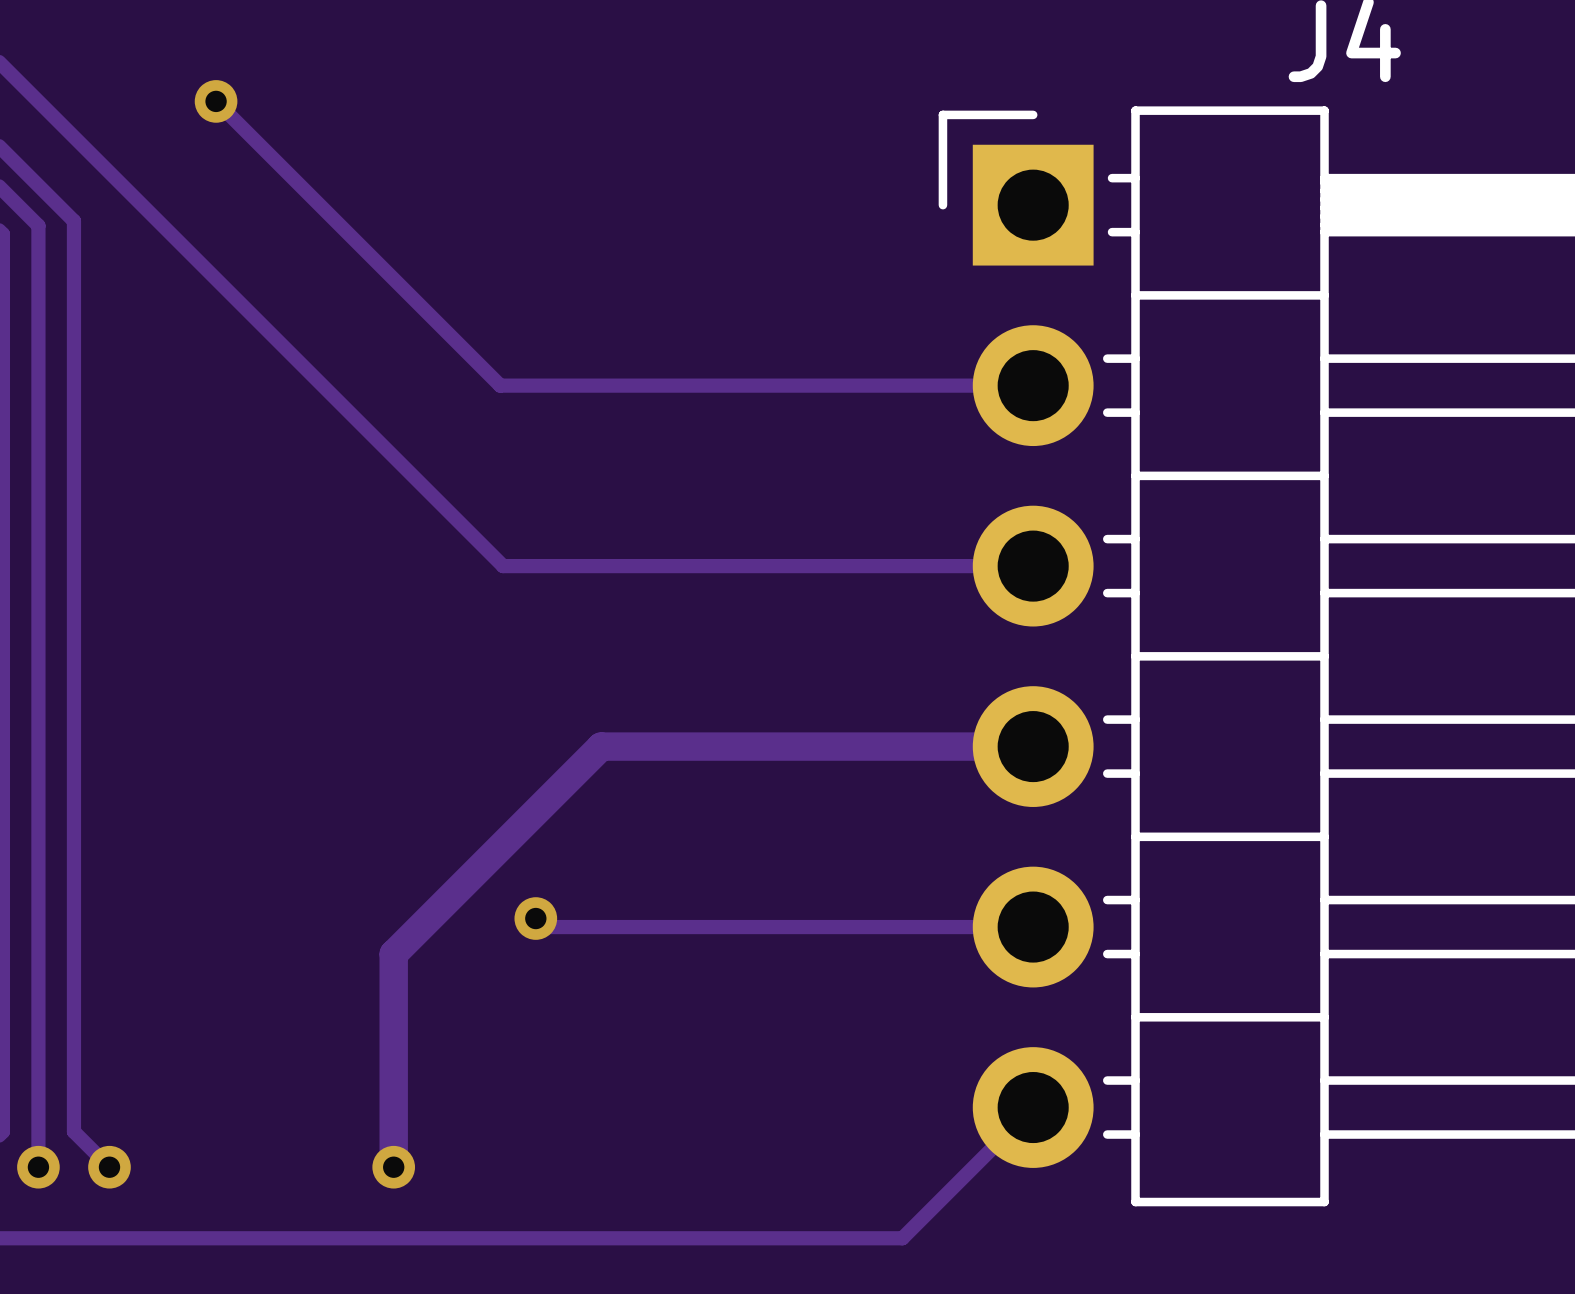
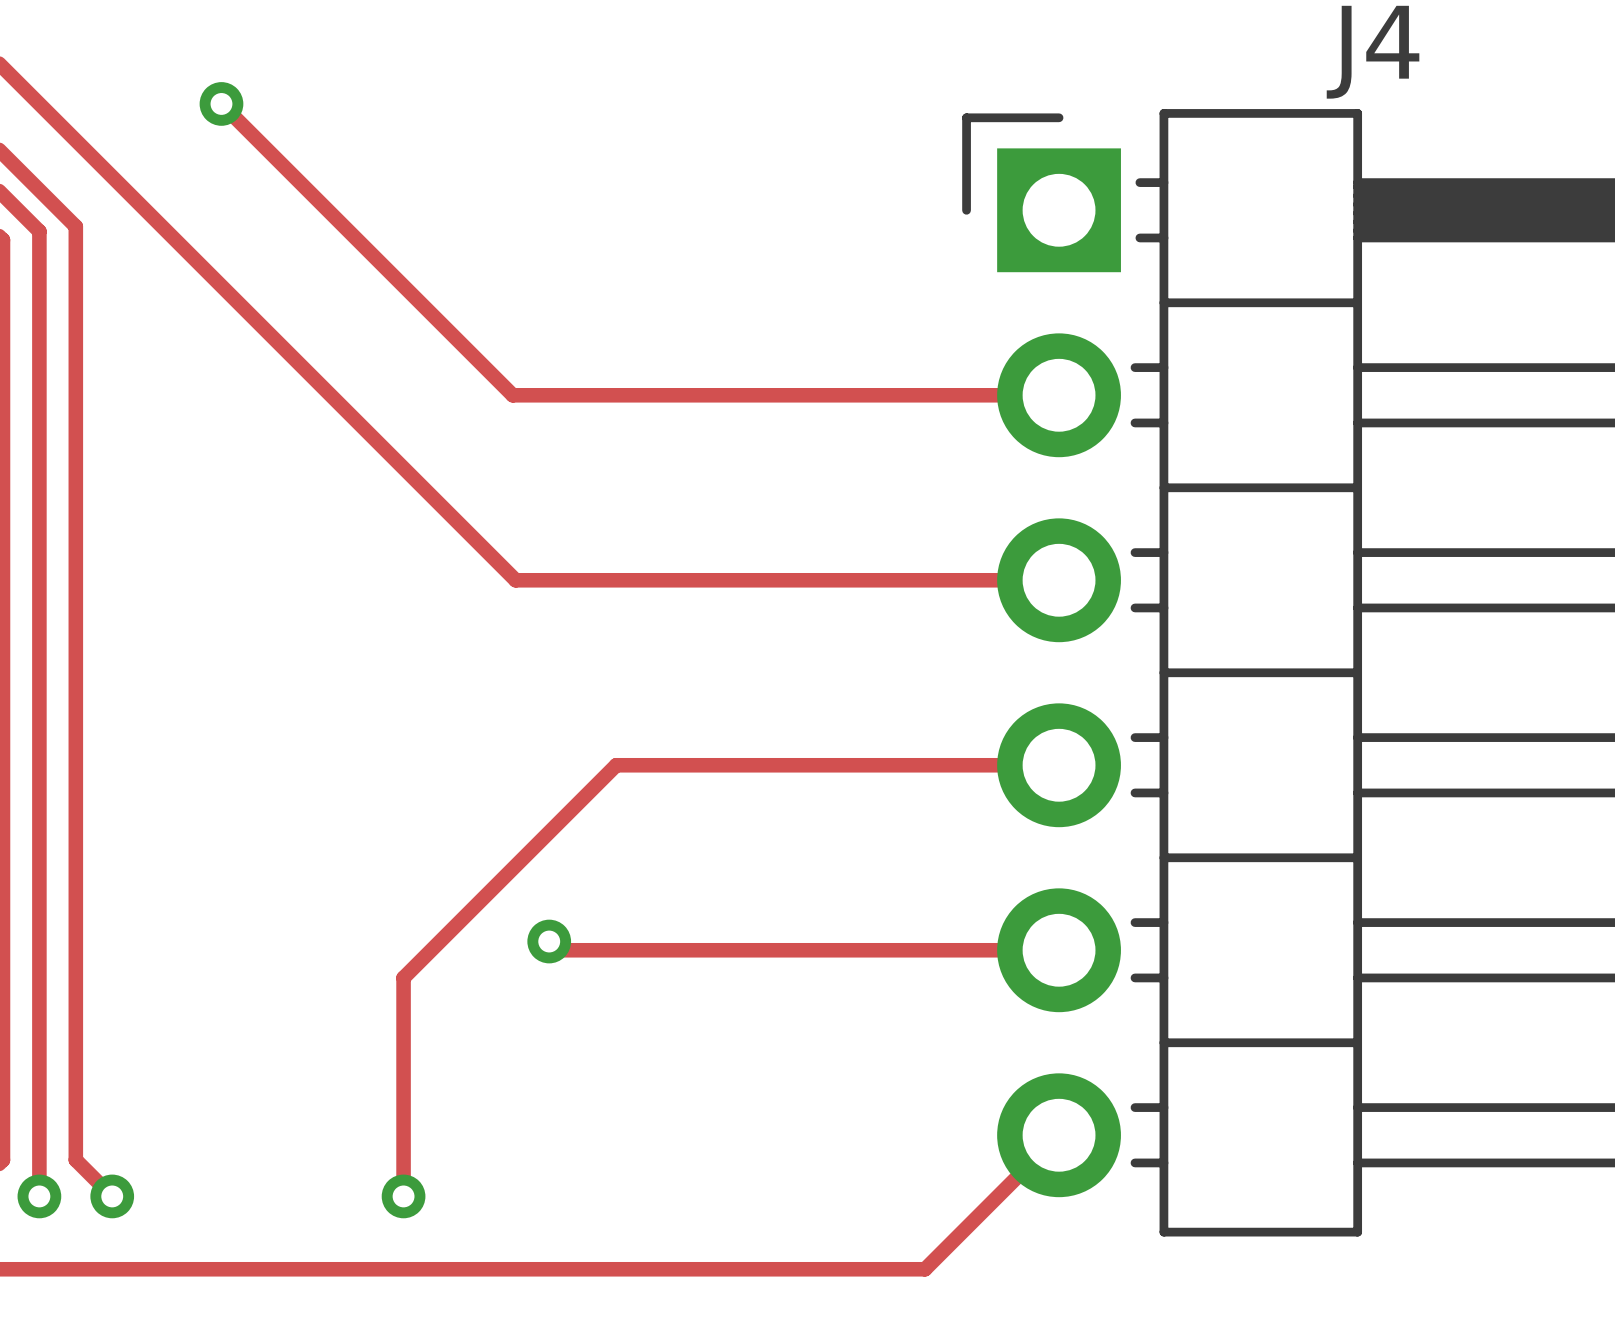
track width: thick (1033, 746) (601, 746) (393, 954) (393, 1167) -> thin (1059, 765) (616, 765) (403, 977) (403, 1196)

